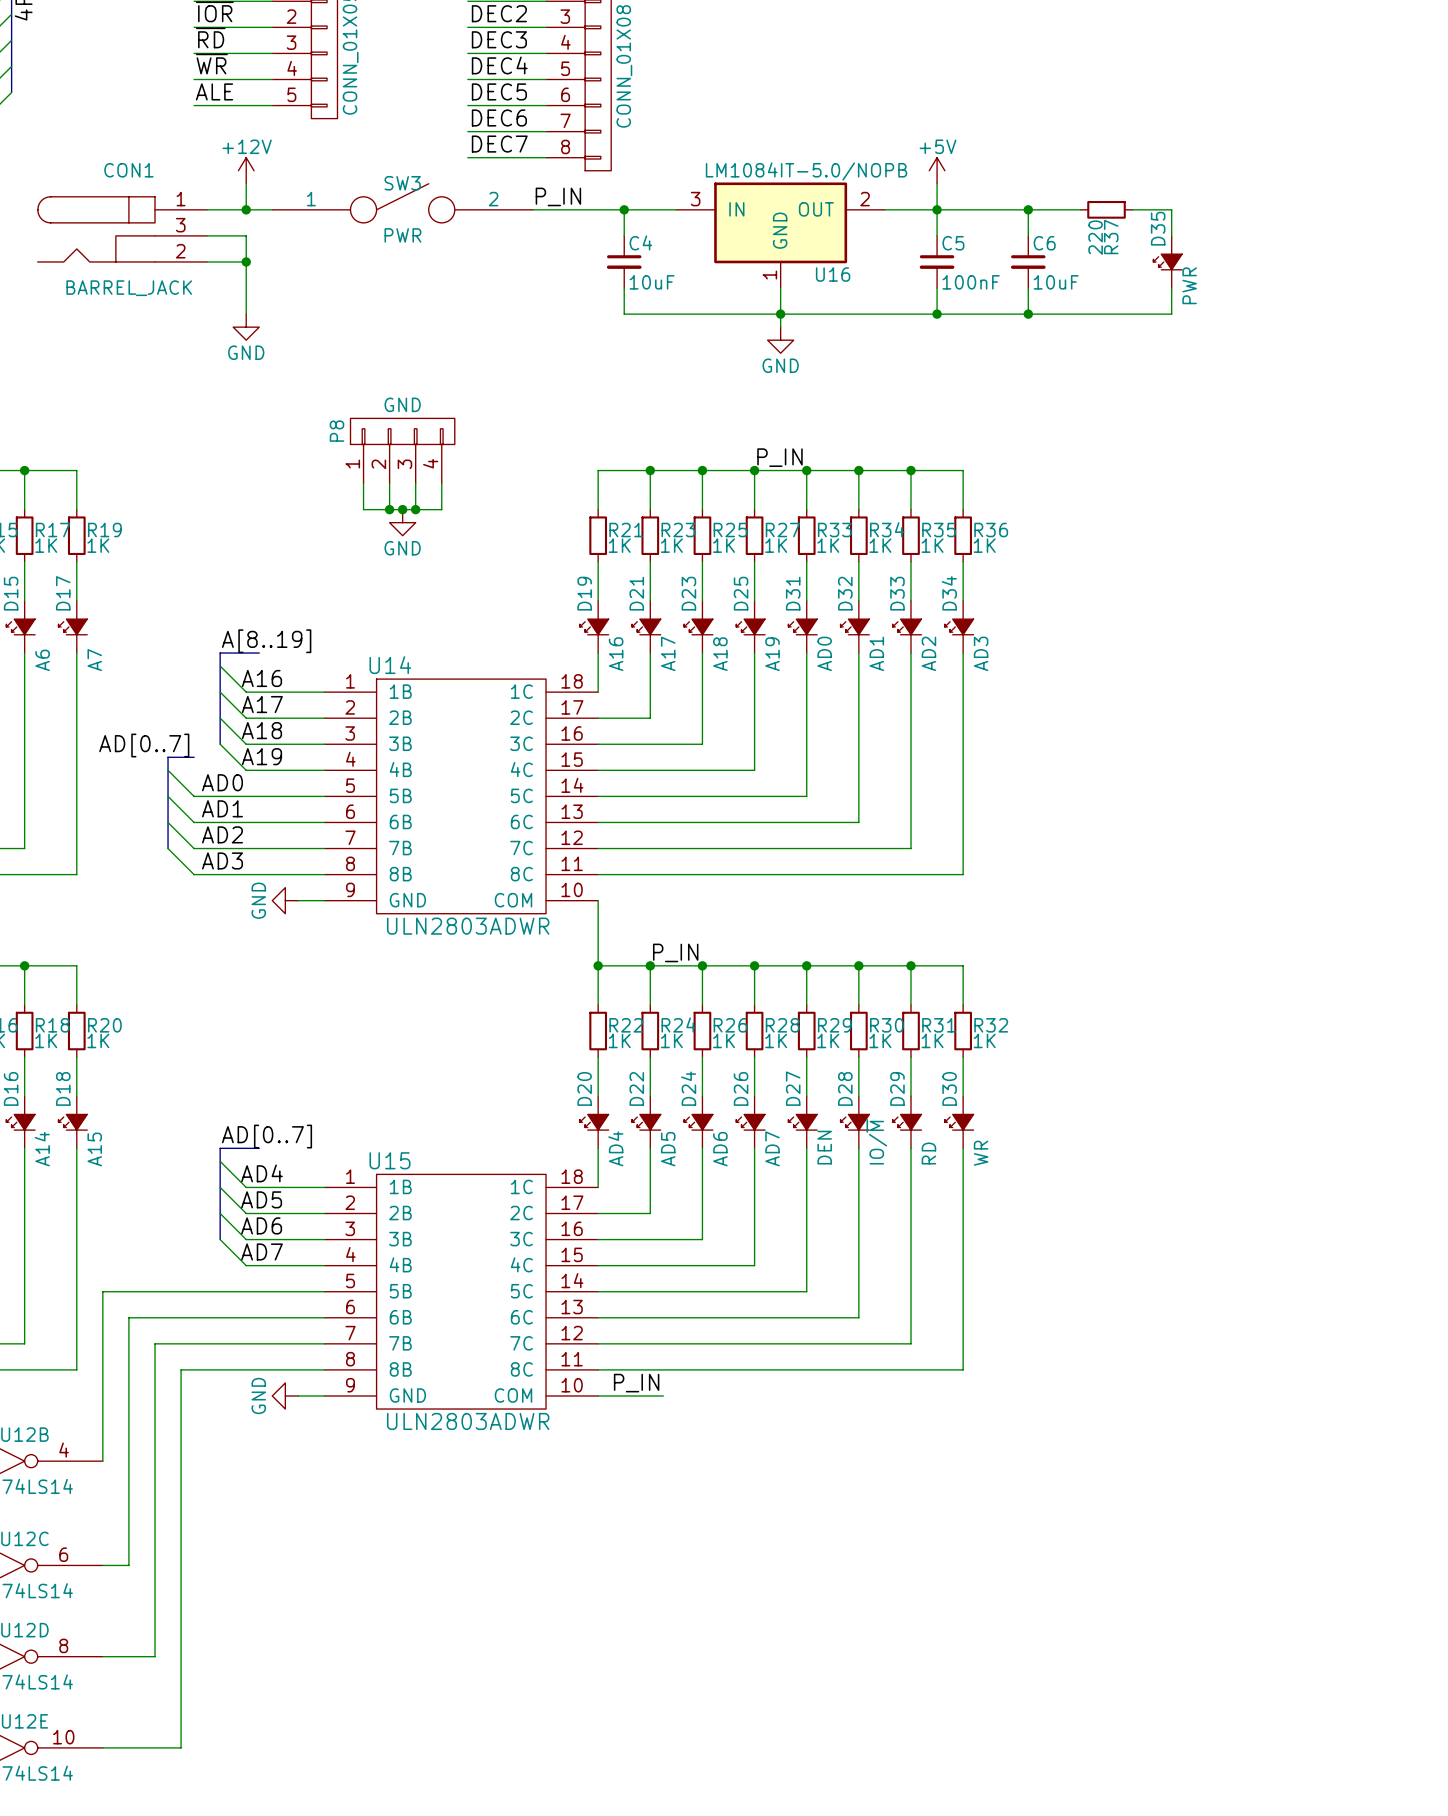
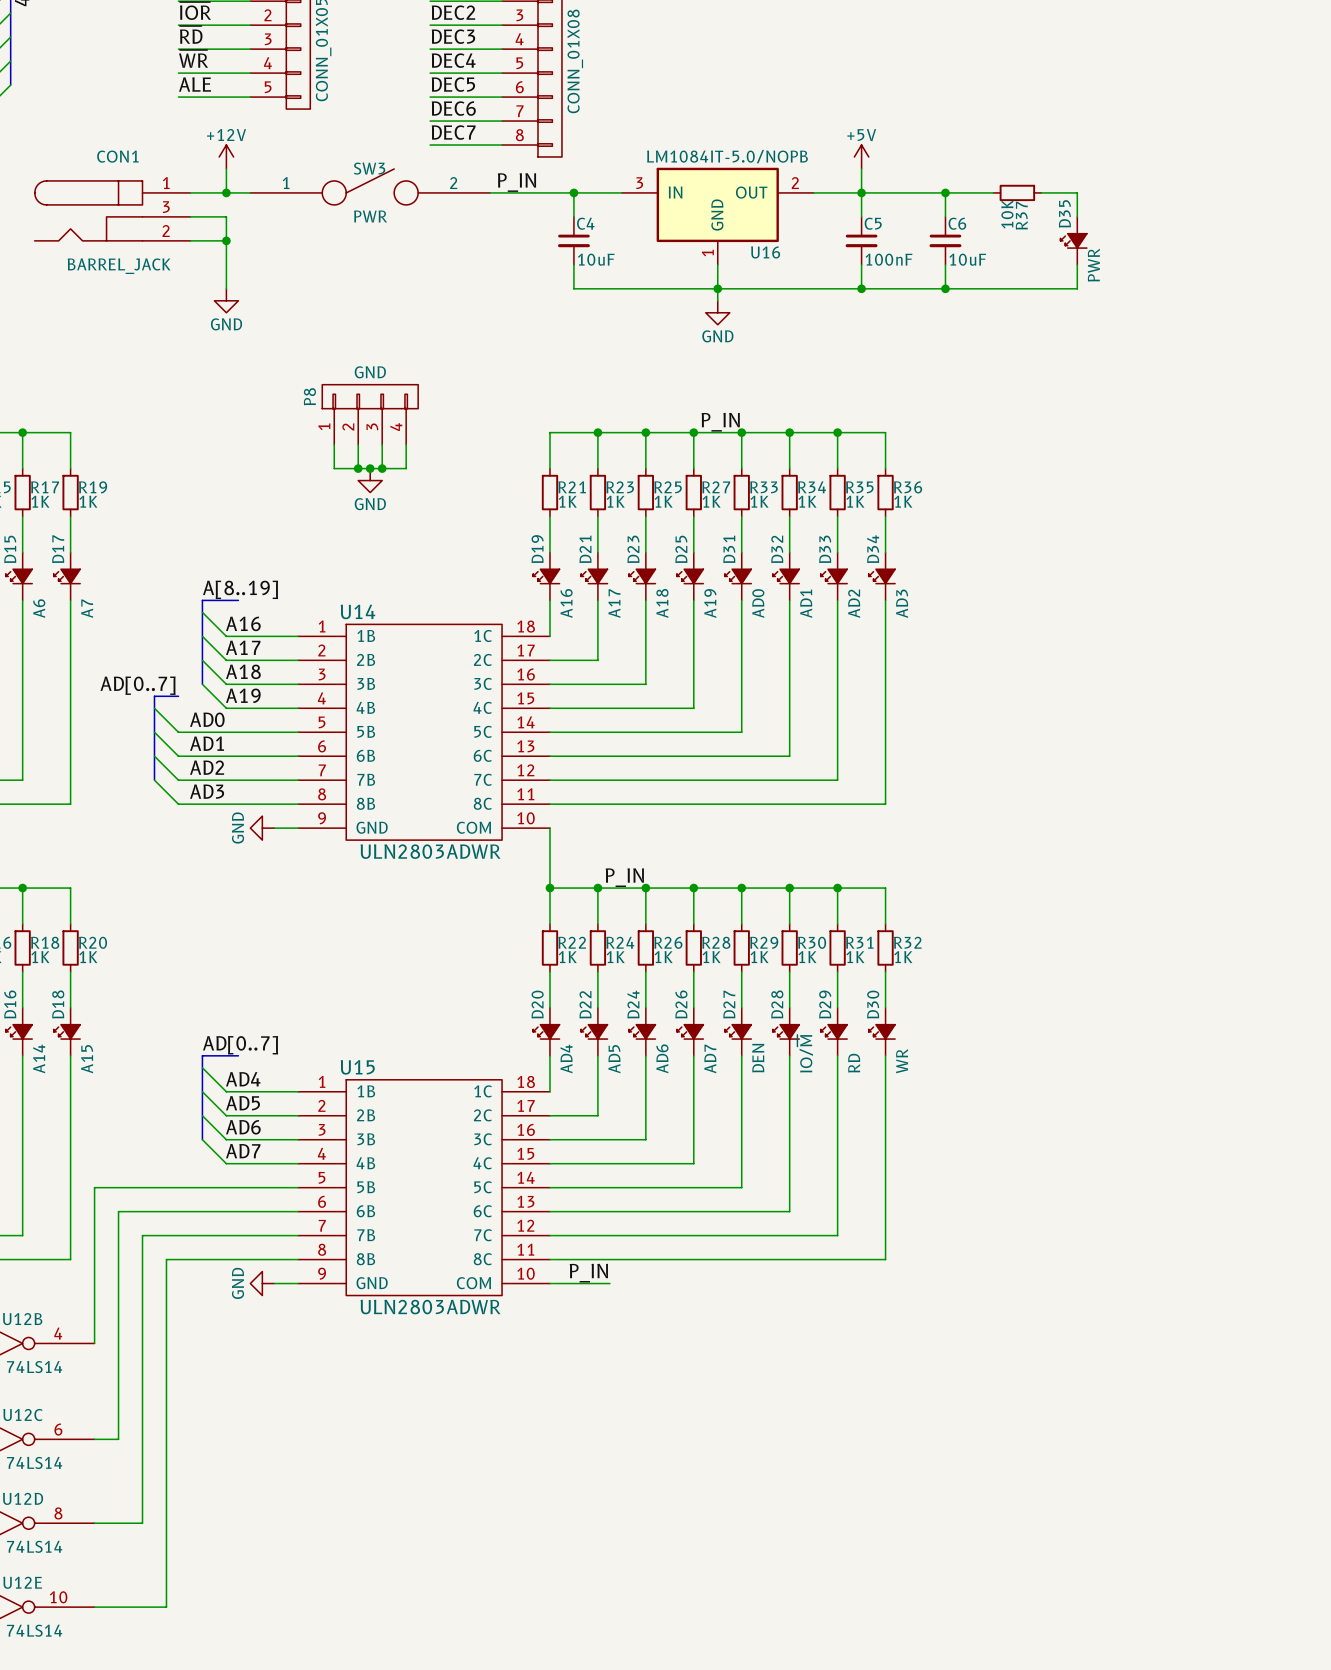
R37 value: 220 (1095, 237) -> 10K (1007, 214)

